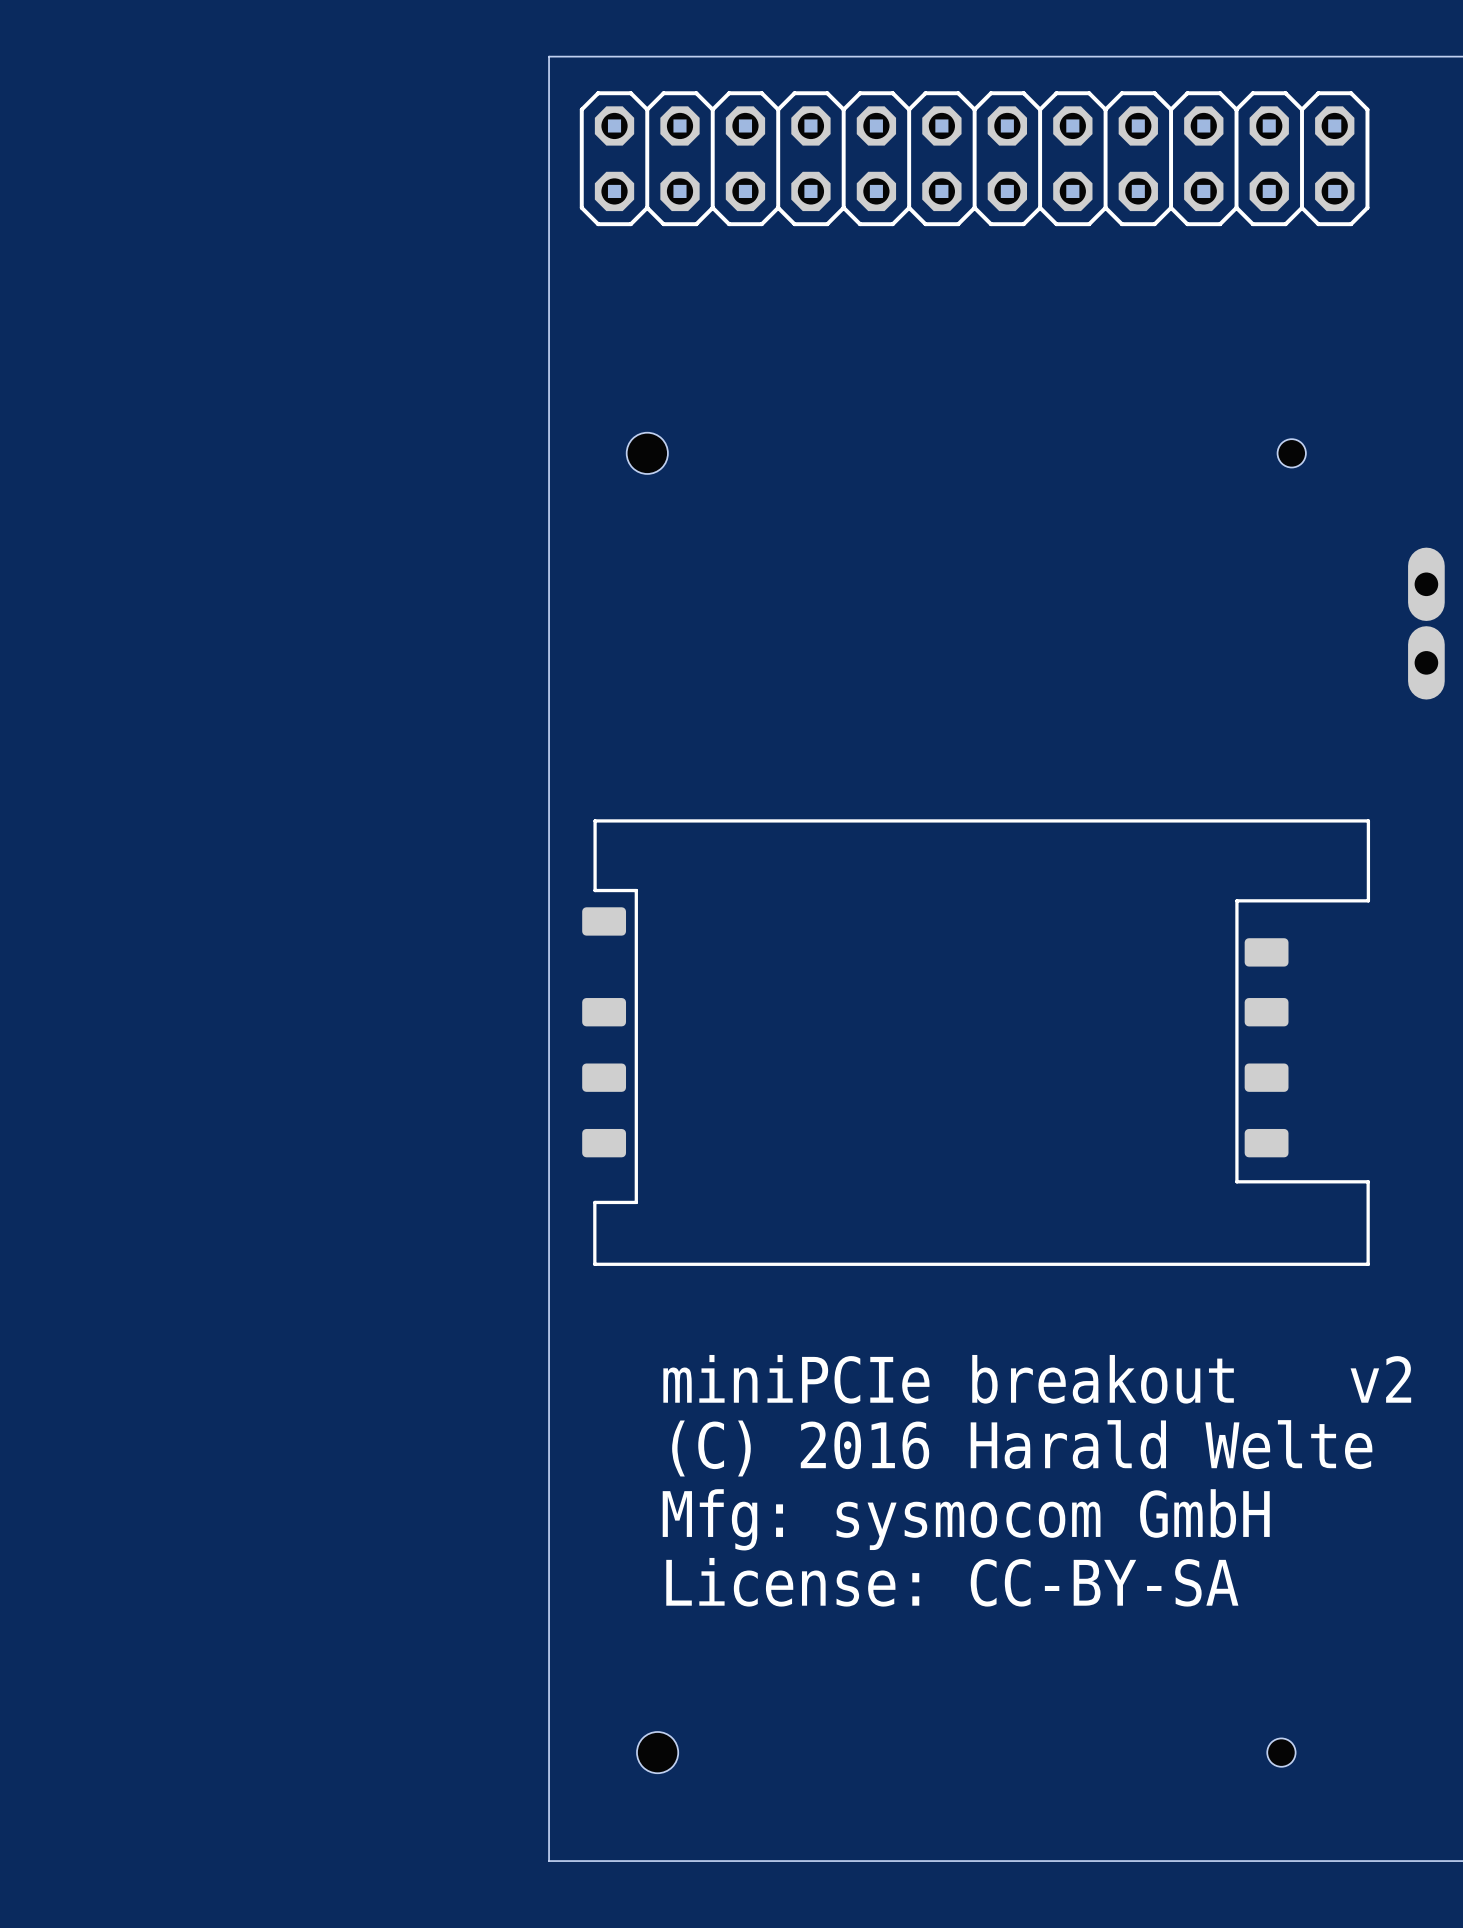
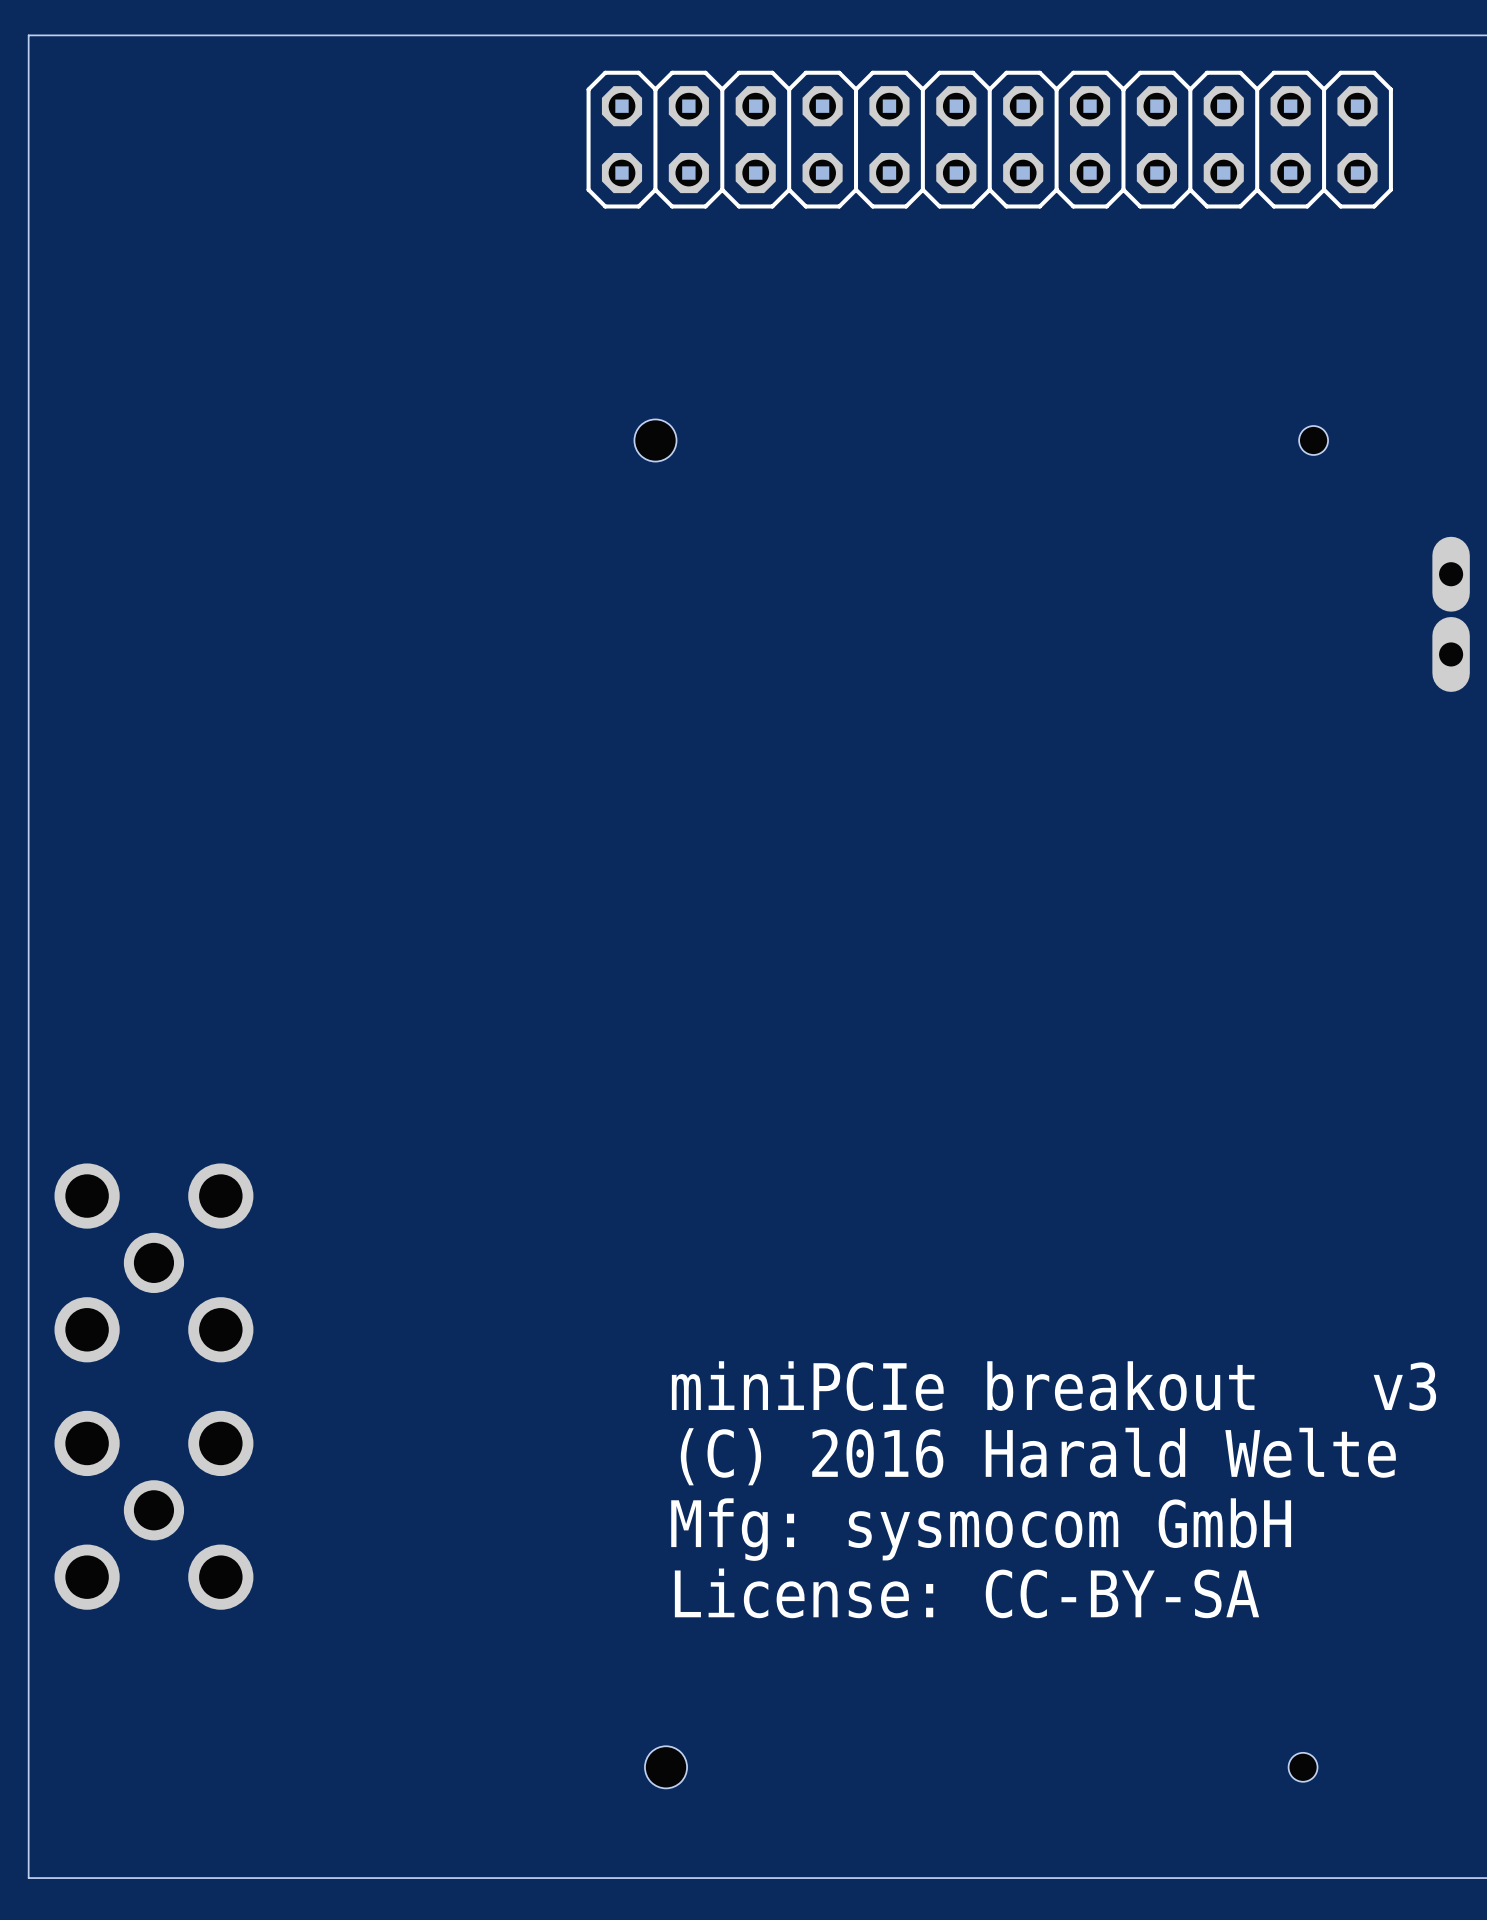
board edge: (549, 56) (549, 1861) -> (555, 35) (28, 35) (28, 1878) (555, 1878)
part: (976, 1042) -> none
part: none -> (153, 1262)
text: v2 (1380, 1379) -> v3 (1404, 1386)
part: none -> (153, 1510)

